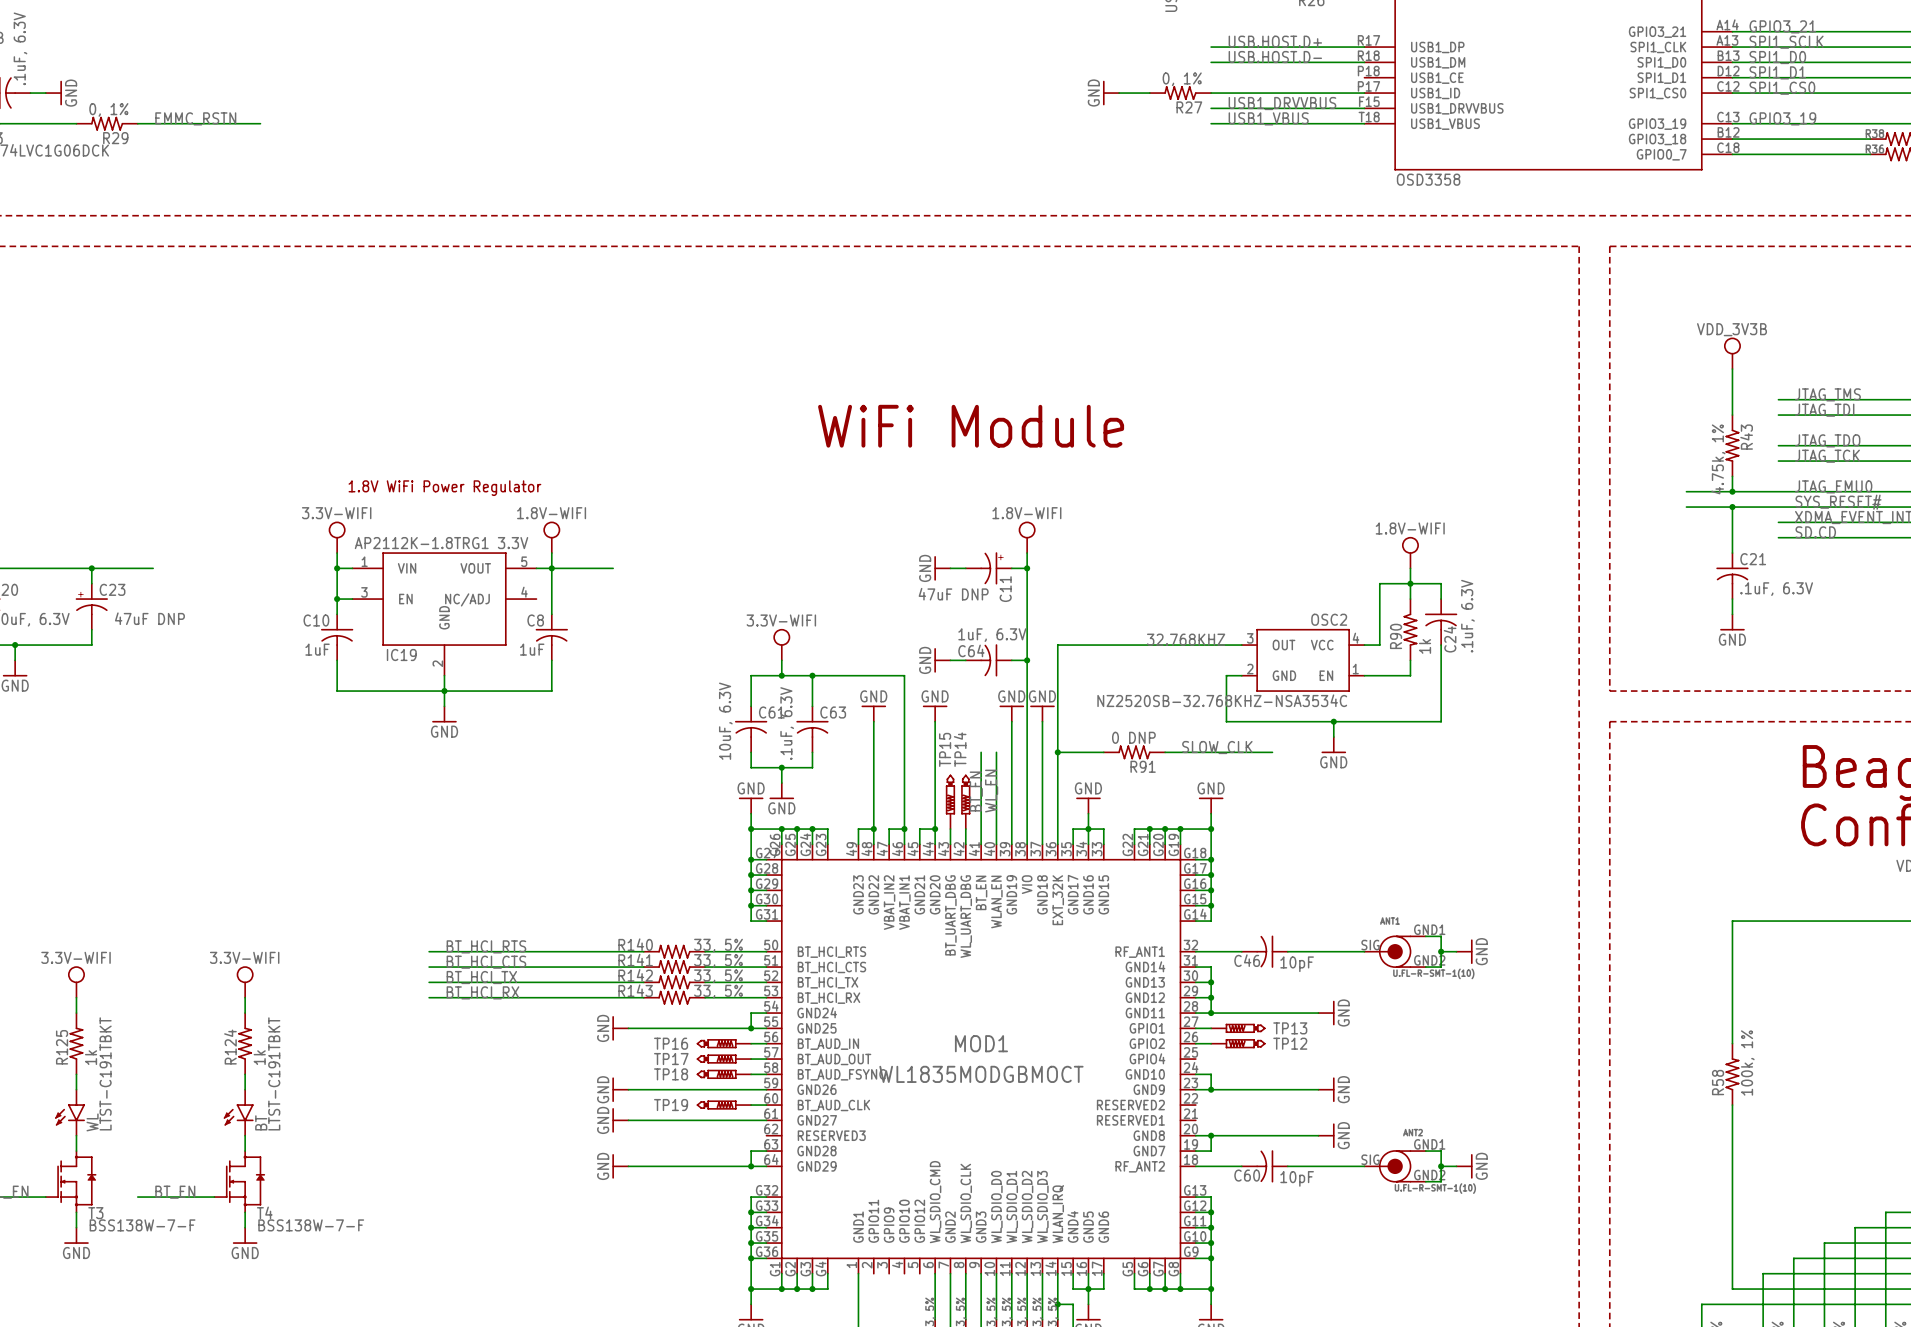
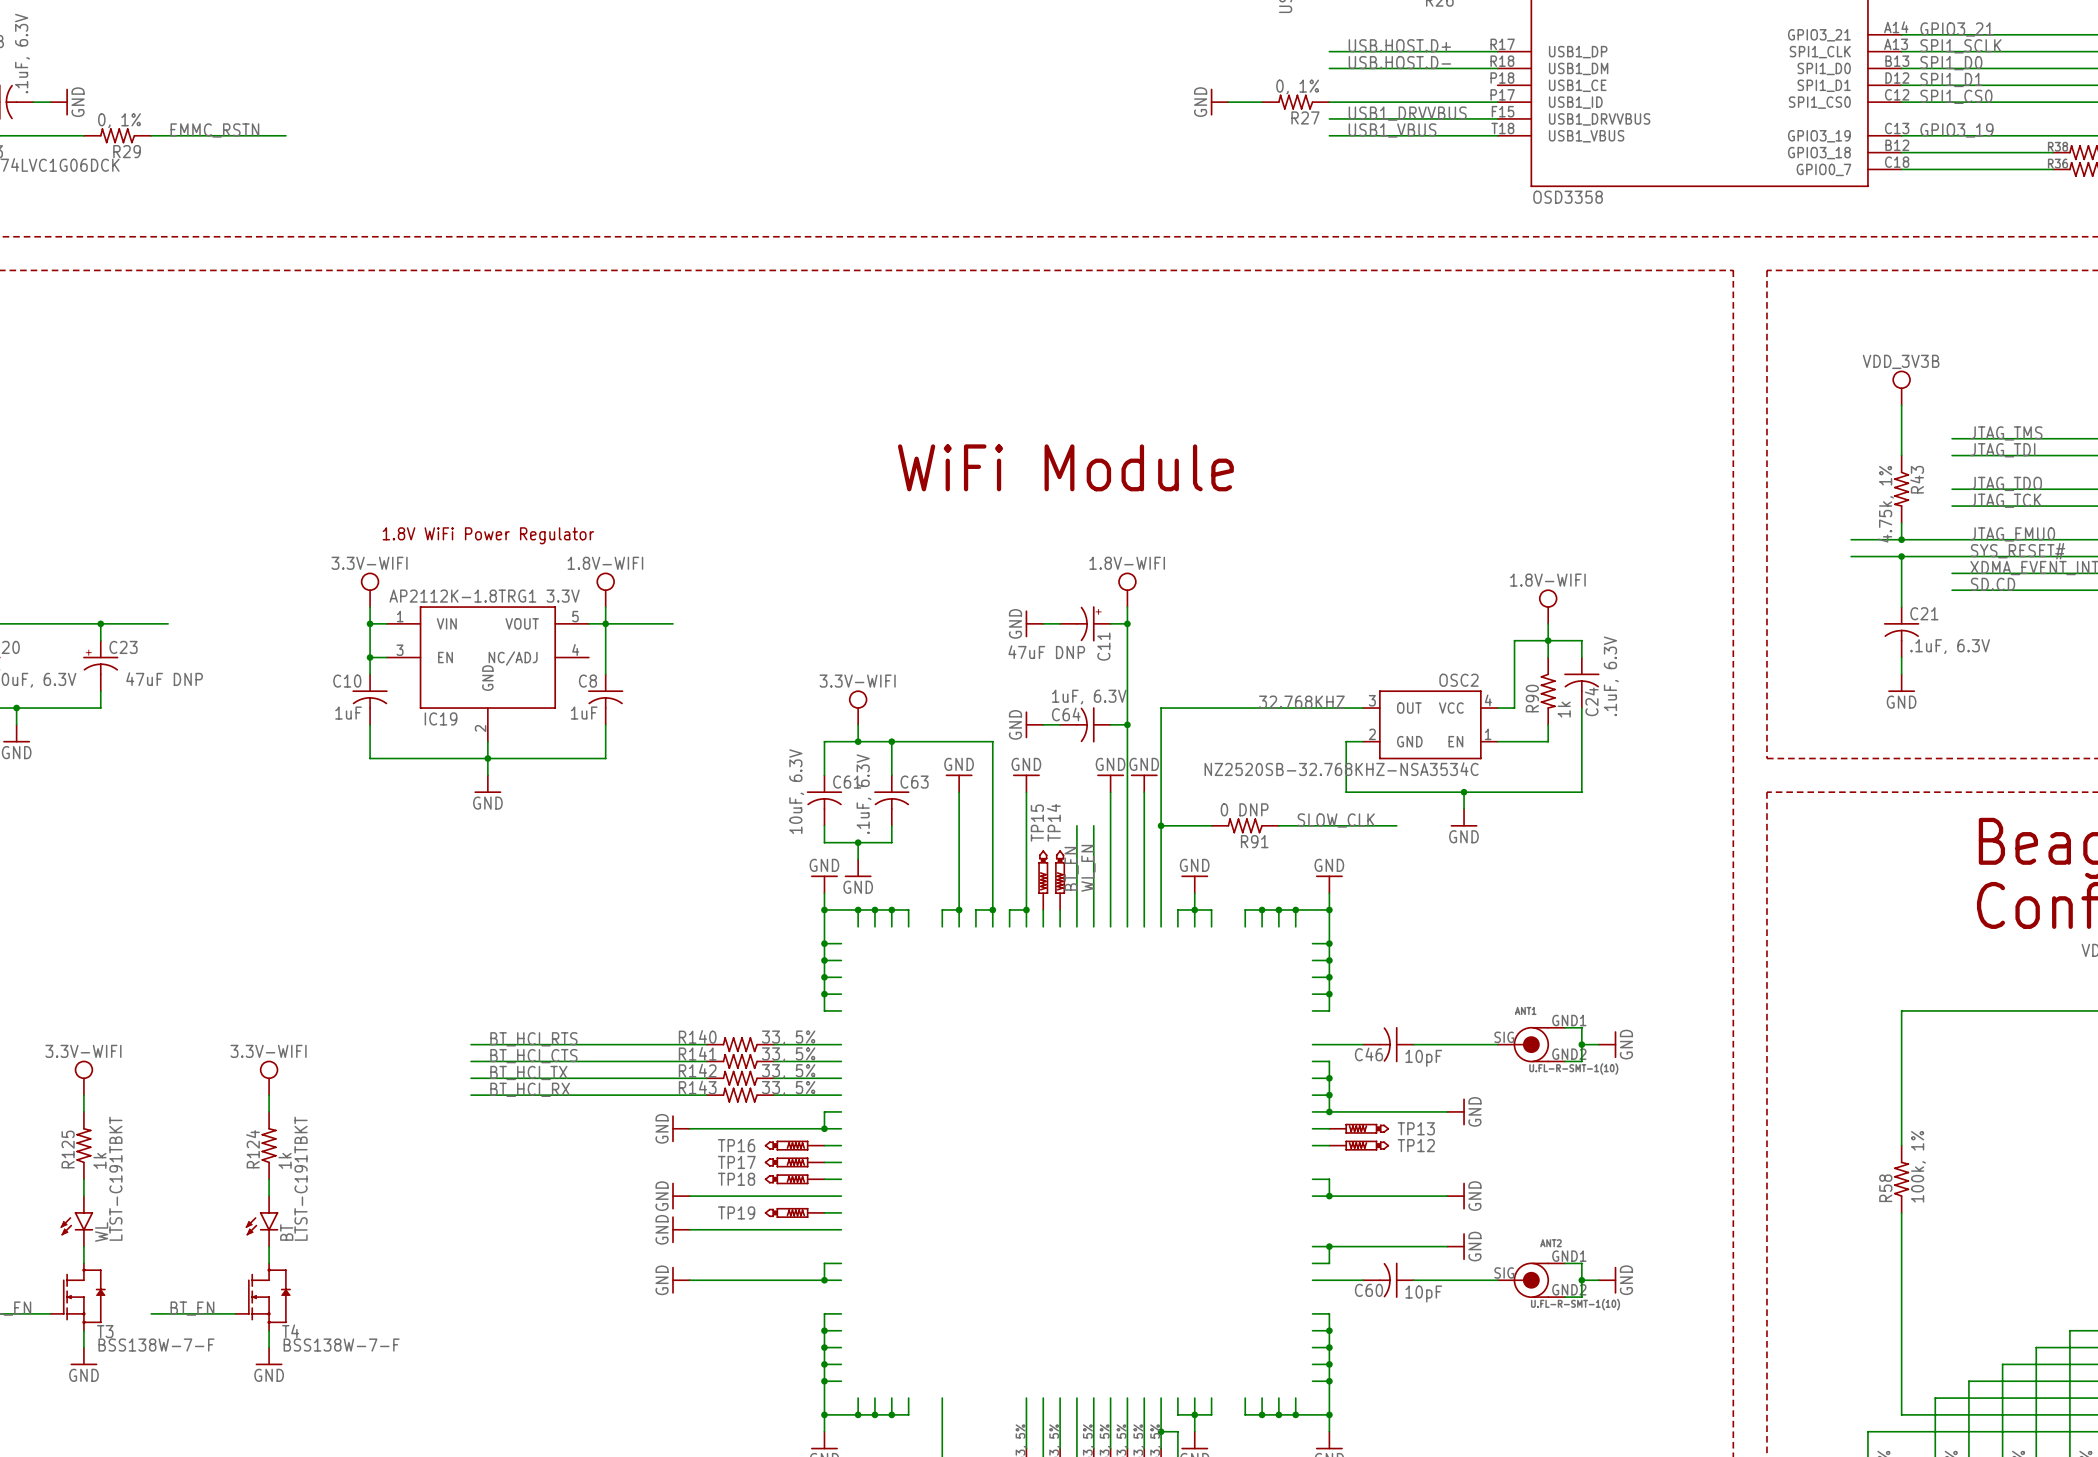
MOD1: WL1835MODGBMOCT (981, 1059) -> none

